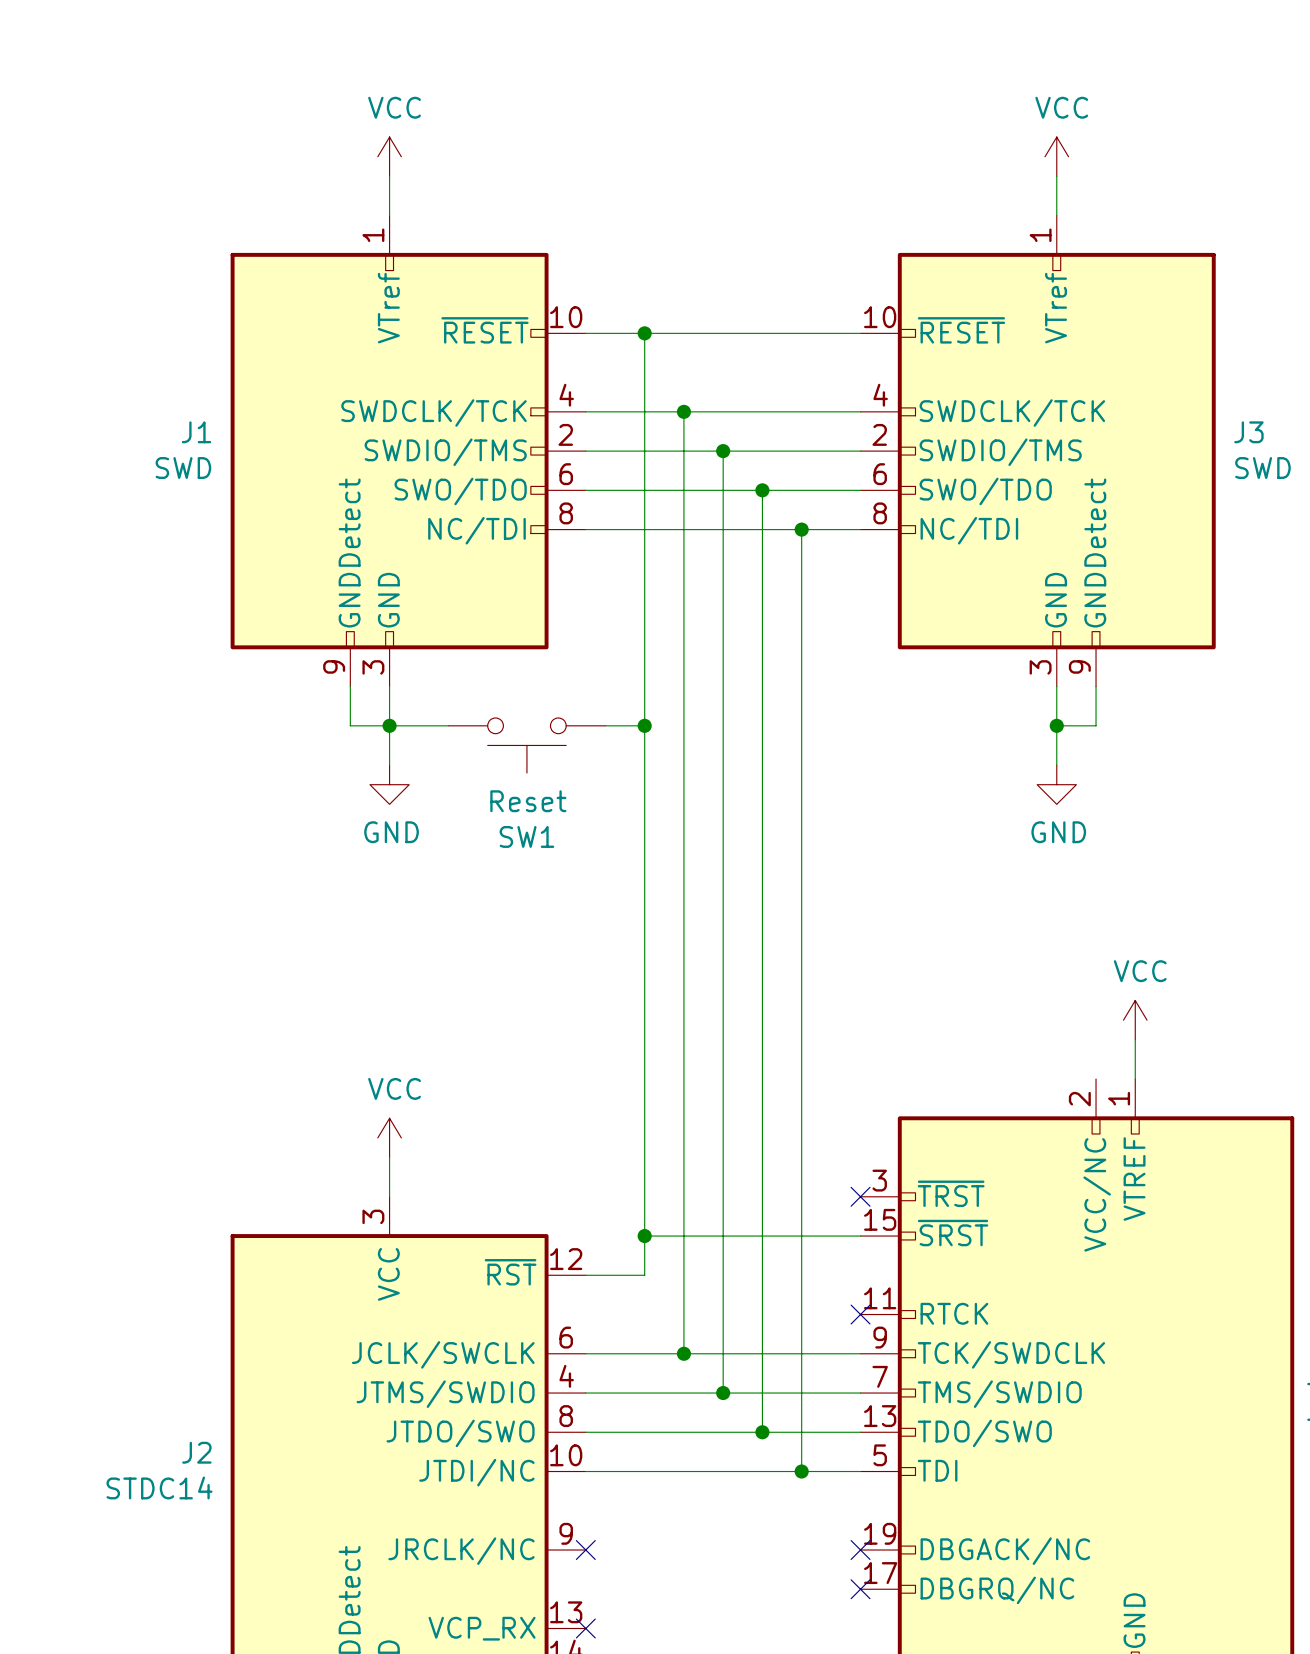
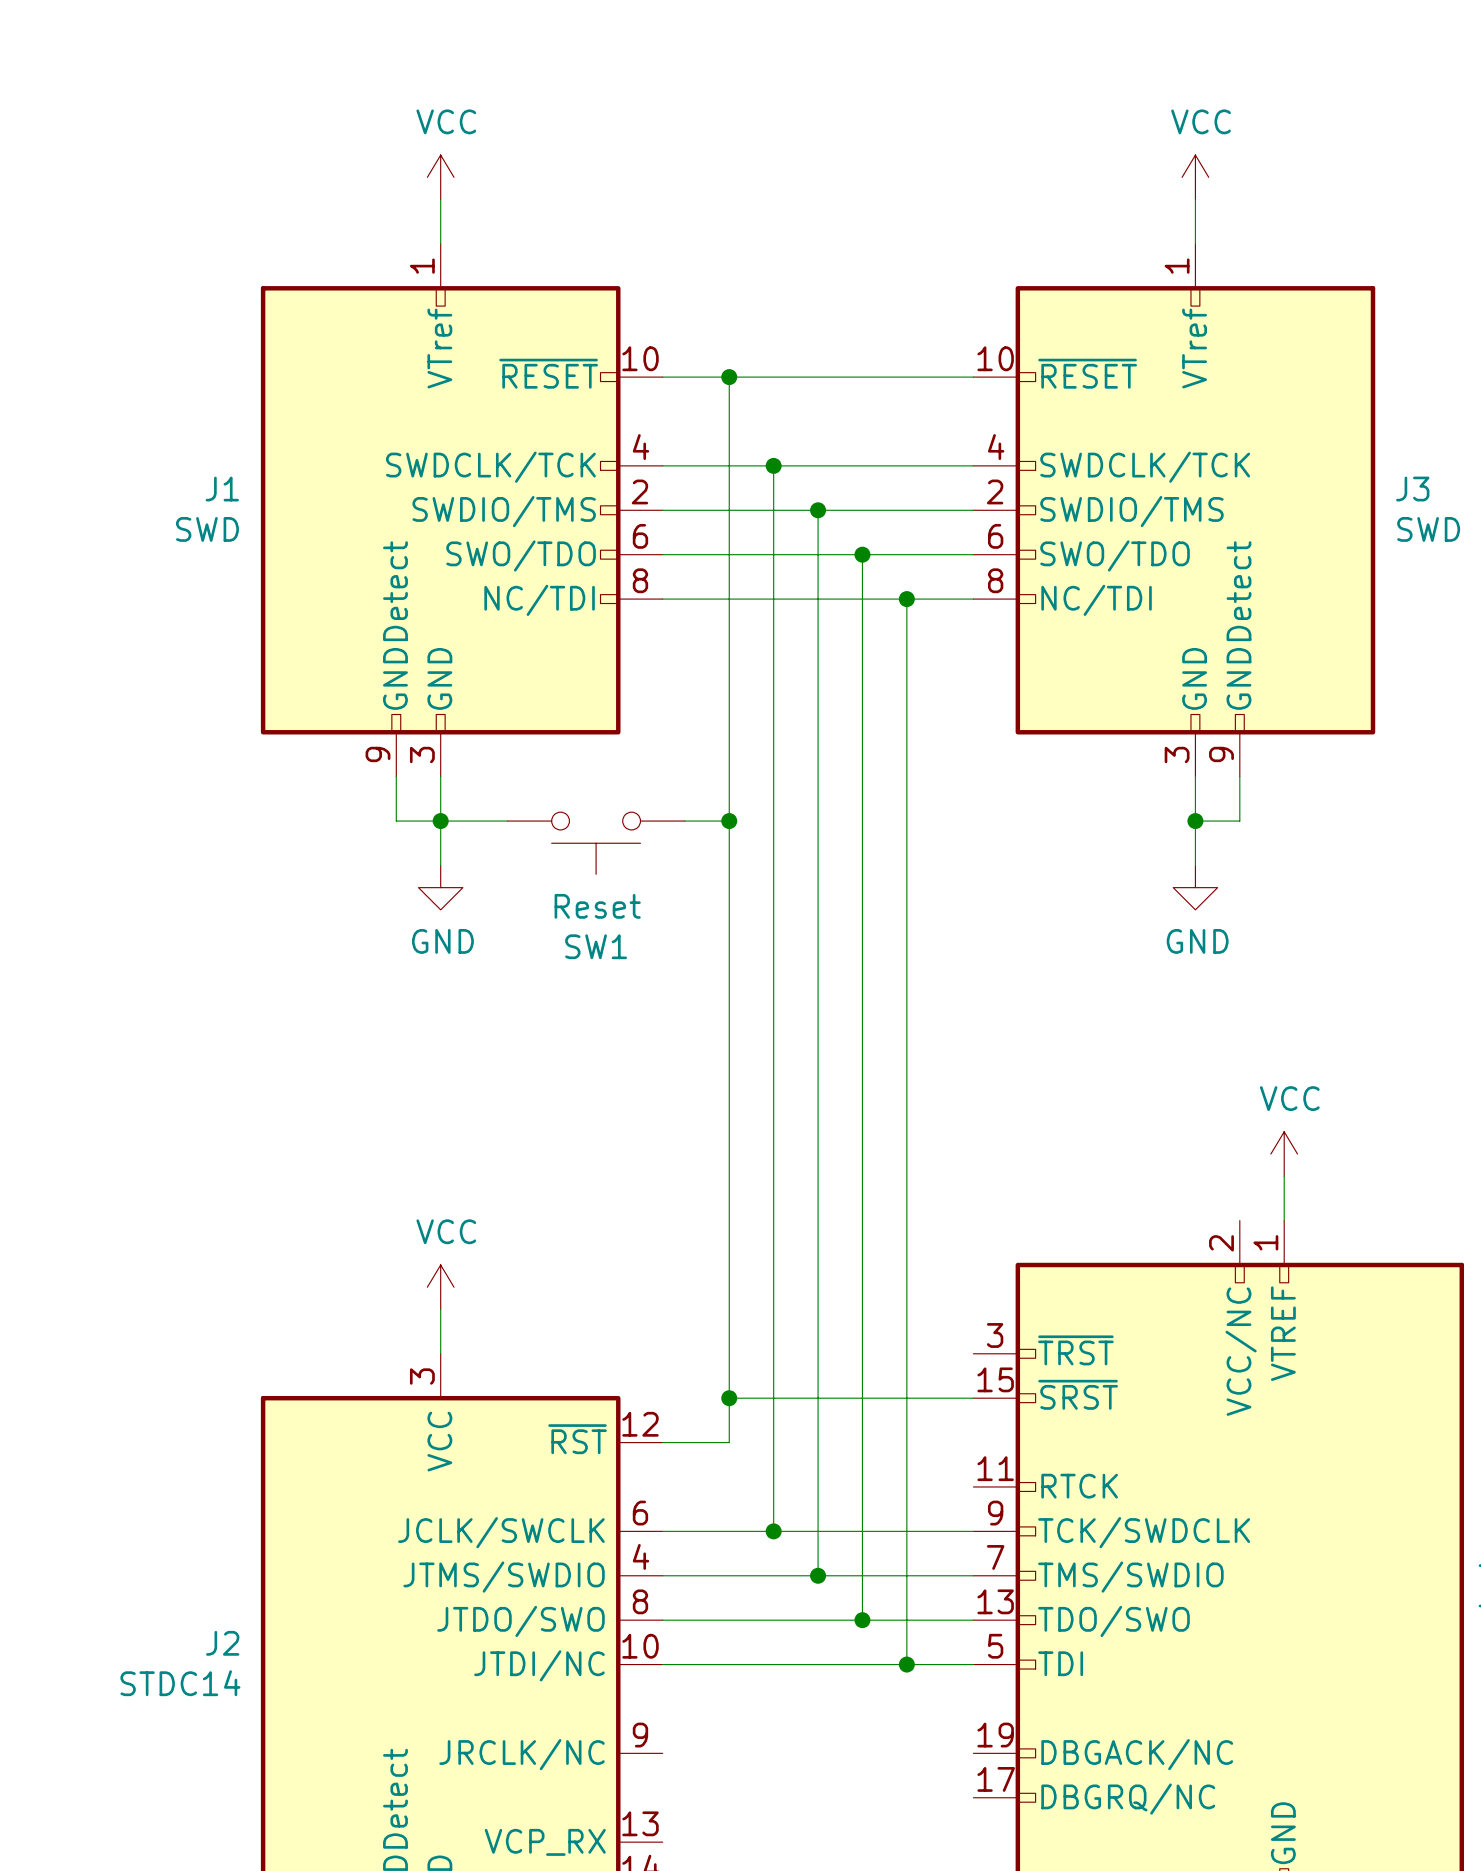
no-connect mark: (860, 1196) -> none
no-connect mark: (860, 1314) -> none
no-connect mark: (585, 1550) -> none
no-connect mark: (860, 1550) -> none
no-connect mark: (860, 1589) -> none
no-connect mark: (585, 1628) -> none

